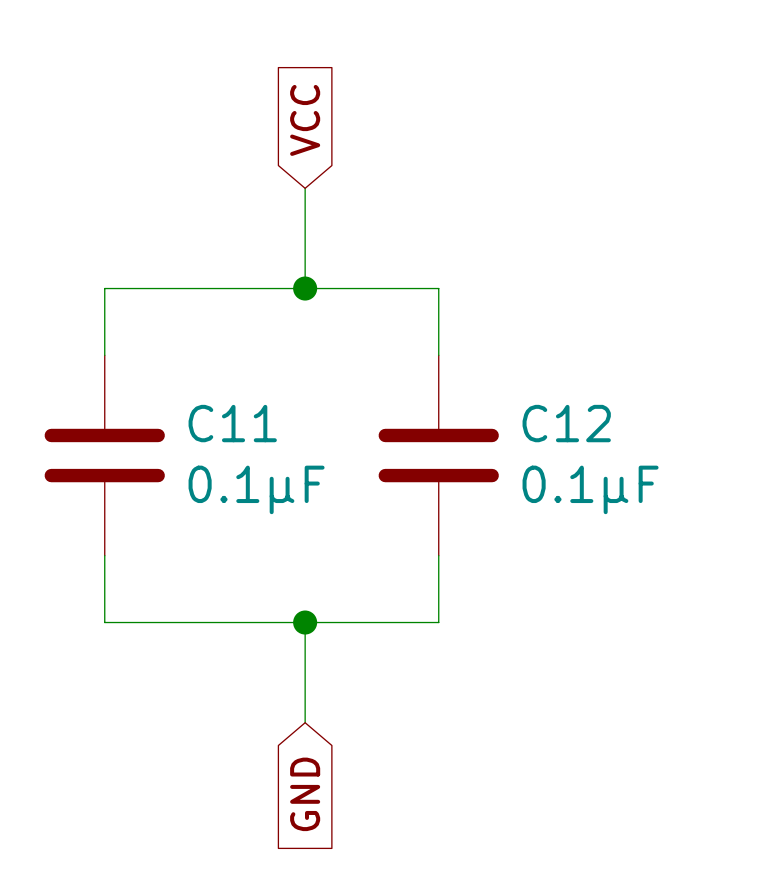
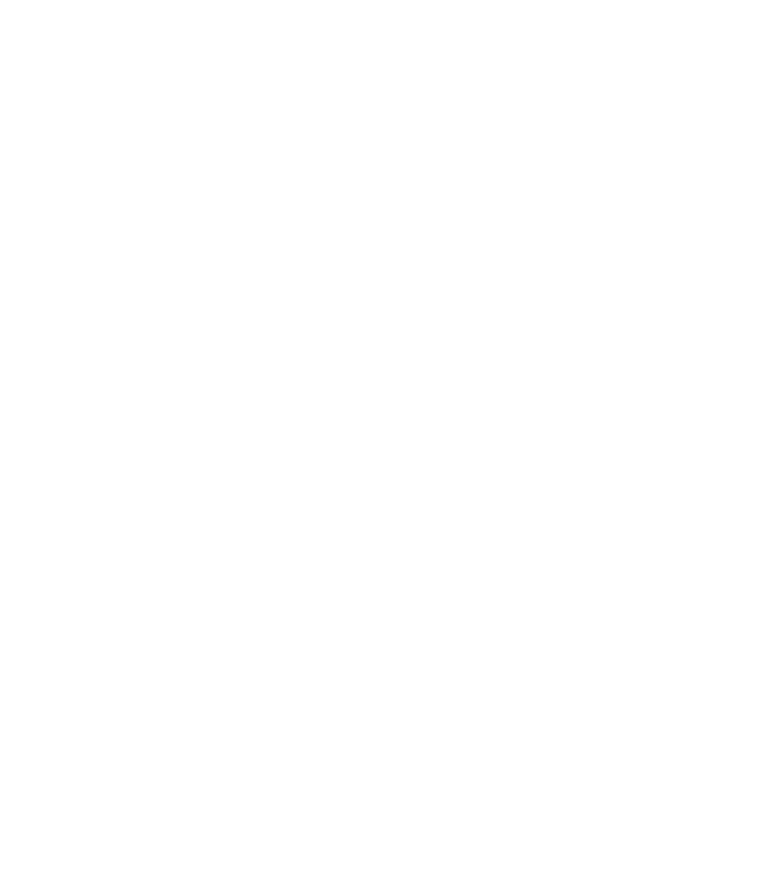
global label: VCC (305, 120) -> none
wire: (305, 188) (305, 288) -> none
junction: (305, 288) -> none
wire: (104, 355) (104, 288) (438, 288) (438, 355) -> none
C11: 0.1µF (104, 455) -> none
C12: 0.1µF (438, 455) -> none
wire: (104, 555) (104, 622) (438, 622) (438, 555) -> none
wire: (305, 622) (305, 722) -> none
junction: (305, 622) -> none
global label: GND (305, 794) -> none

